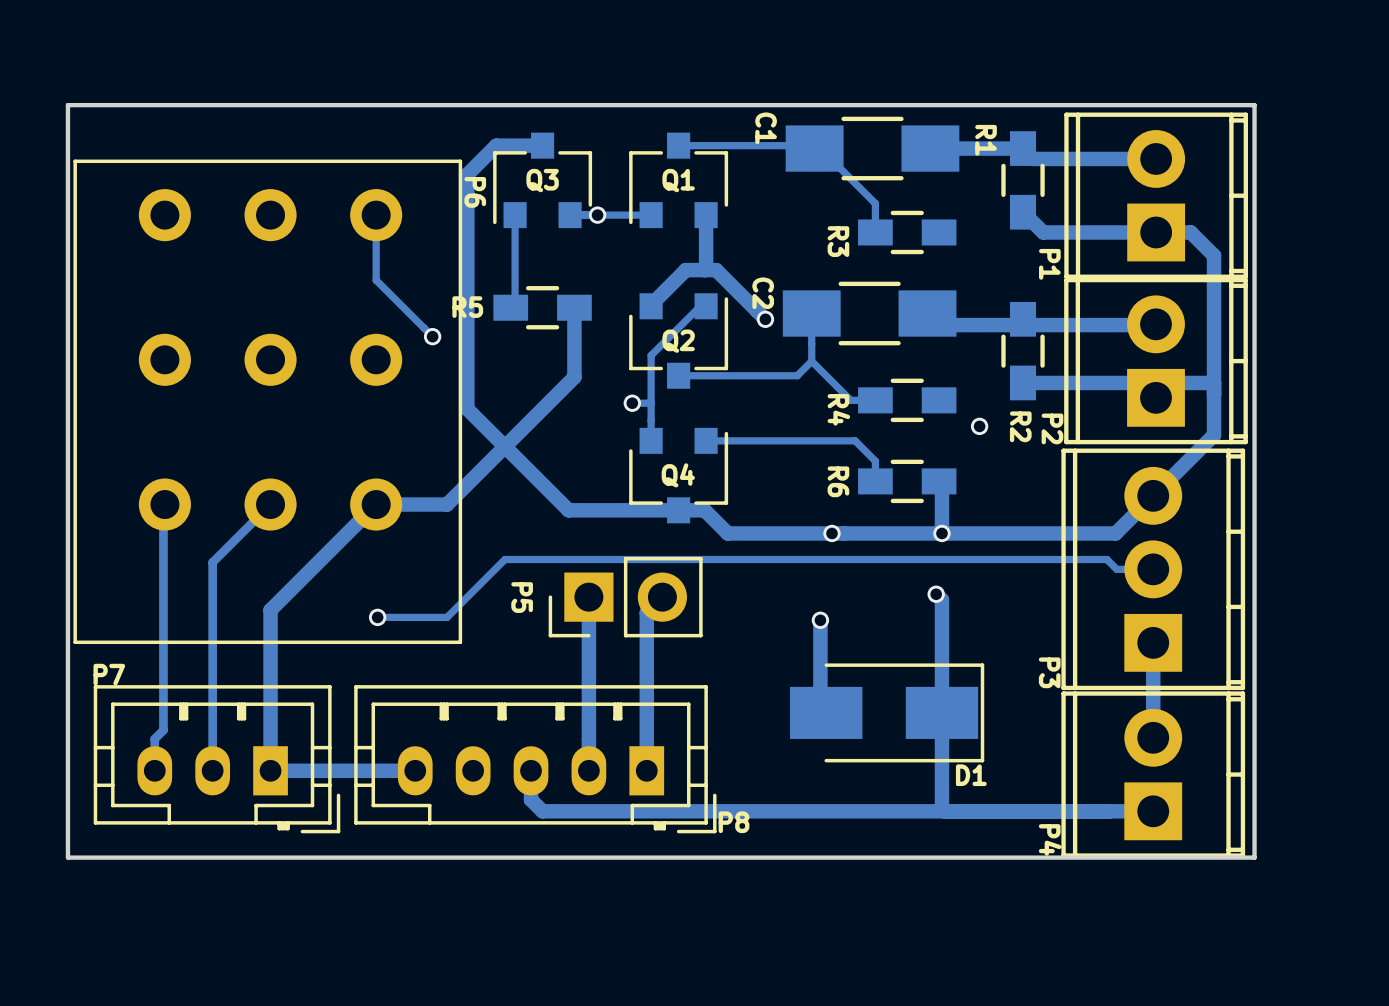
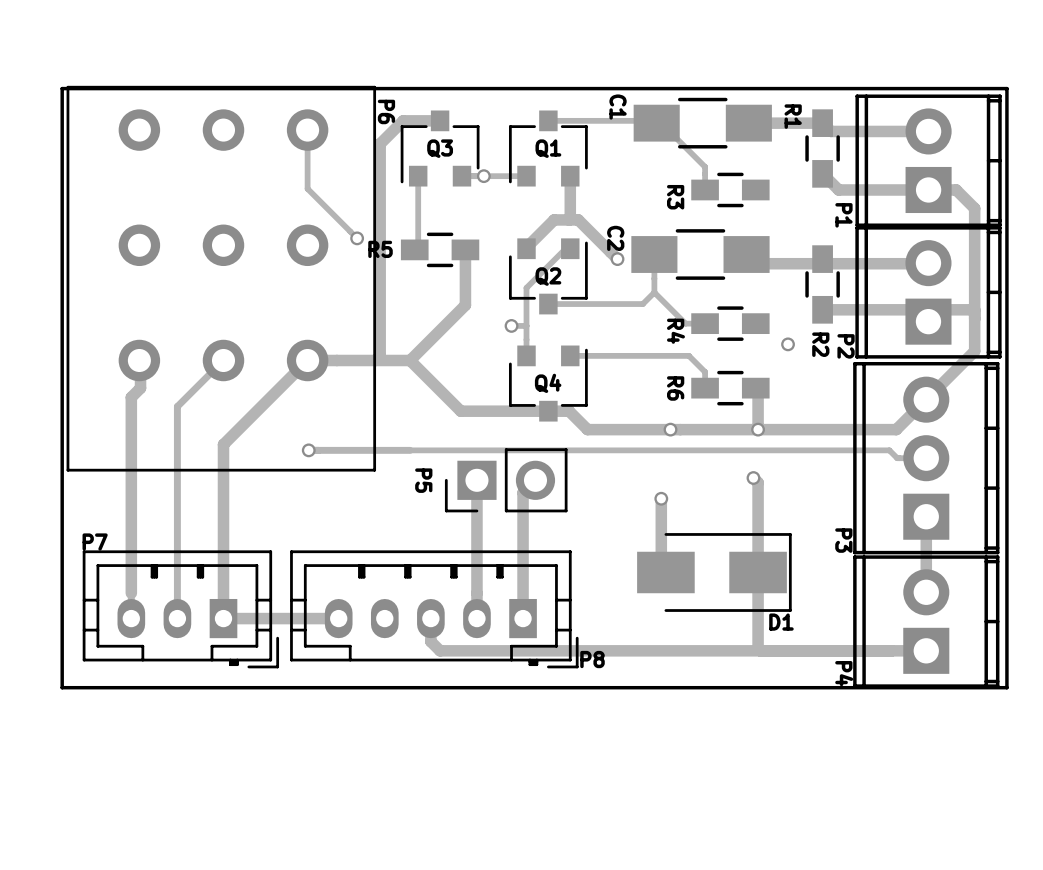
track: none -> (307, 130) (307, 176)
track: (376, 231) (376, 280) (432, 336) -> (307, 188) (357, 238)
via position: (432, 336) -> (357, 238)
P6 position: (267, 401) -> (221, 278)
track: (467, 409) (504, 446) (447, 504) (376, 504) (270, 610) -> (410, 360) (307, 360) (223, 444) (223, 490)
track: none -> (380, 330) (380, 355) (375, 360)
track: (164, 504) (154, 514) (163, 523) (163, 730) (154, 738) -> (139, 360) (131, 368) (140, 377) (140, 388) (131, 397) (131, 593)
track: (270, 504) (212, 562) -> (223, 360) (177, 406) (177, 452)
track: (504, 559) (447, 617) (377, 617) -> (410, 450) (308, 450)
via position: (377, 617) -> (308, 450)

